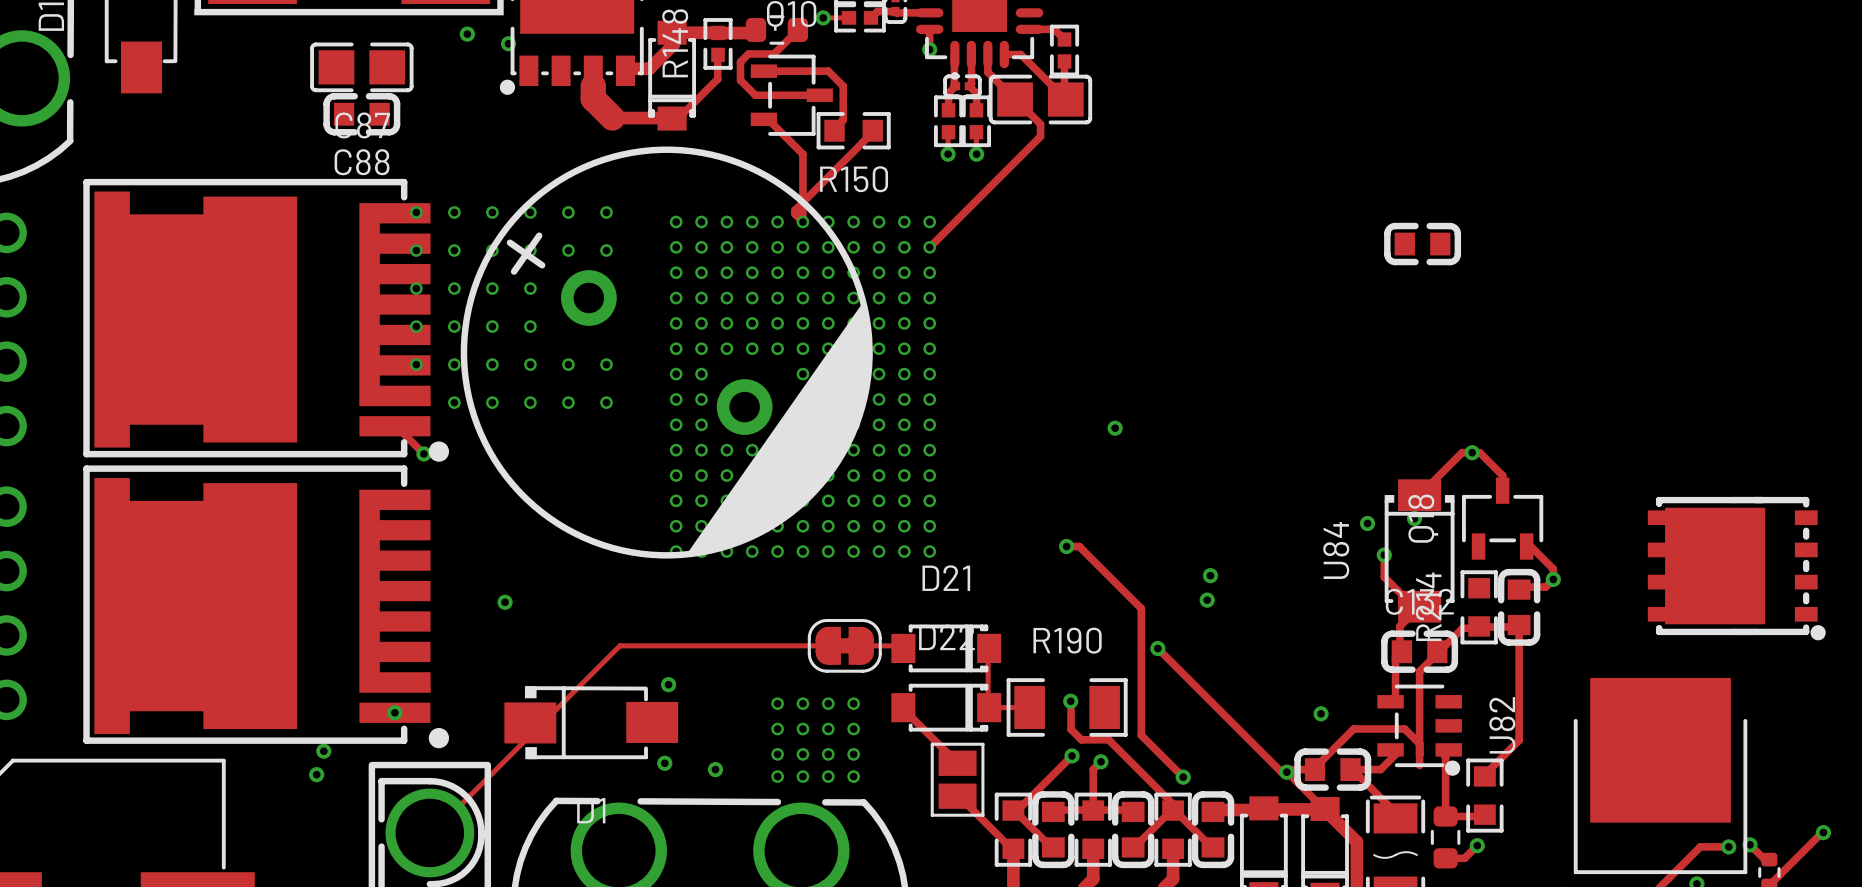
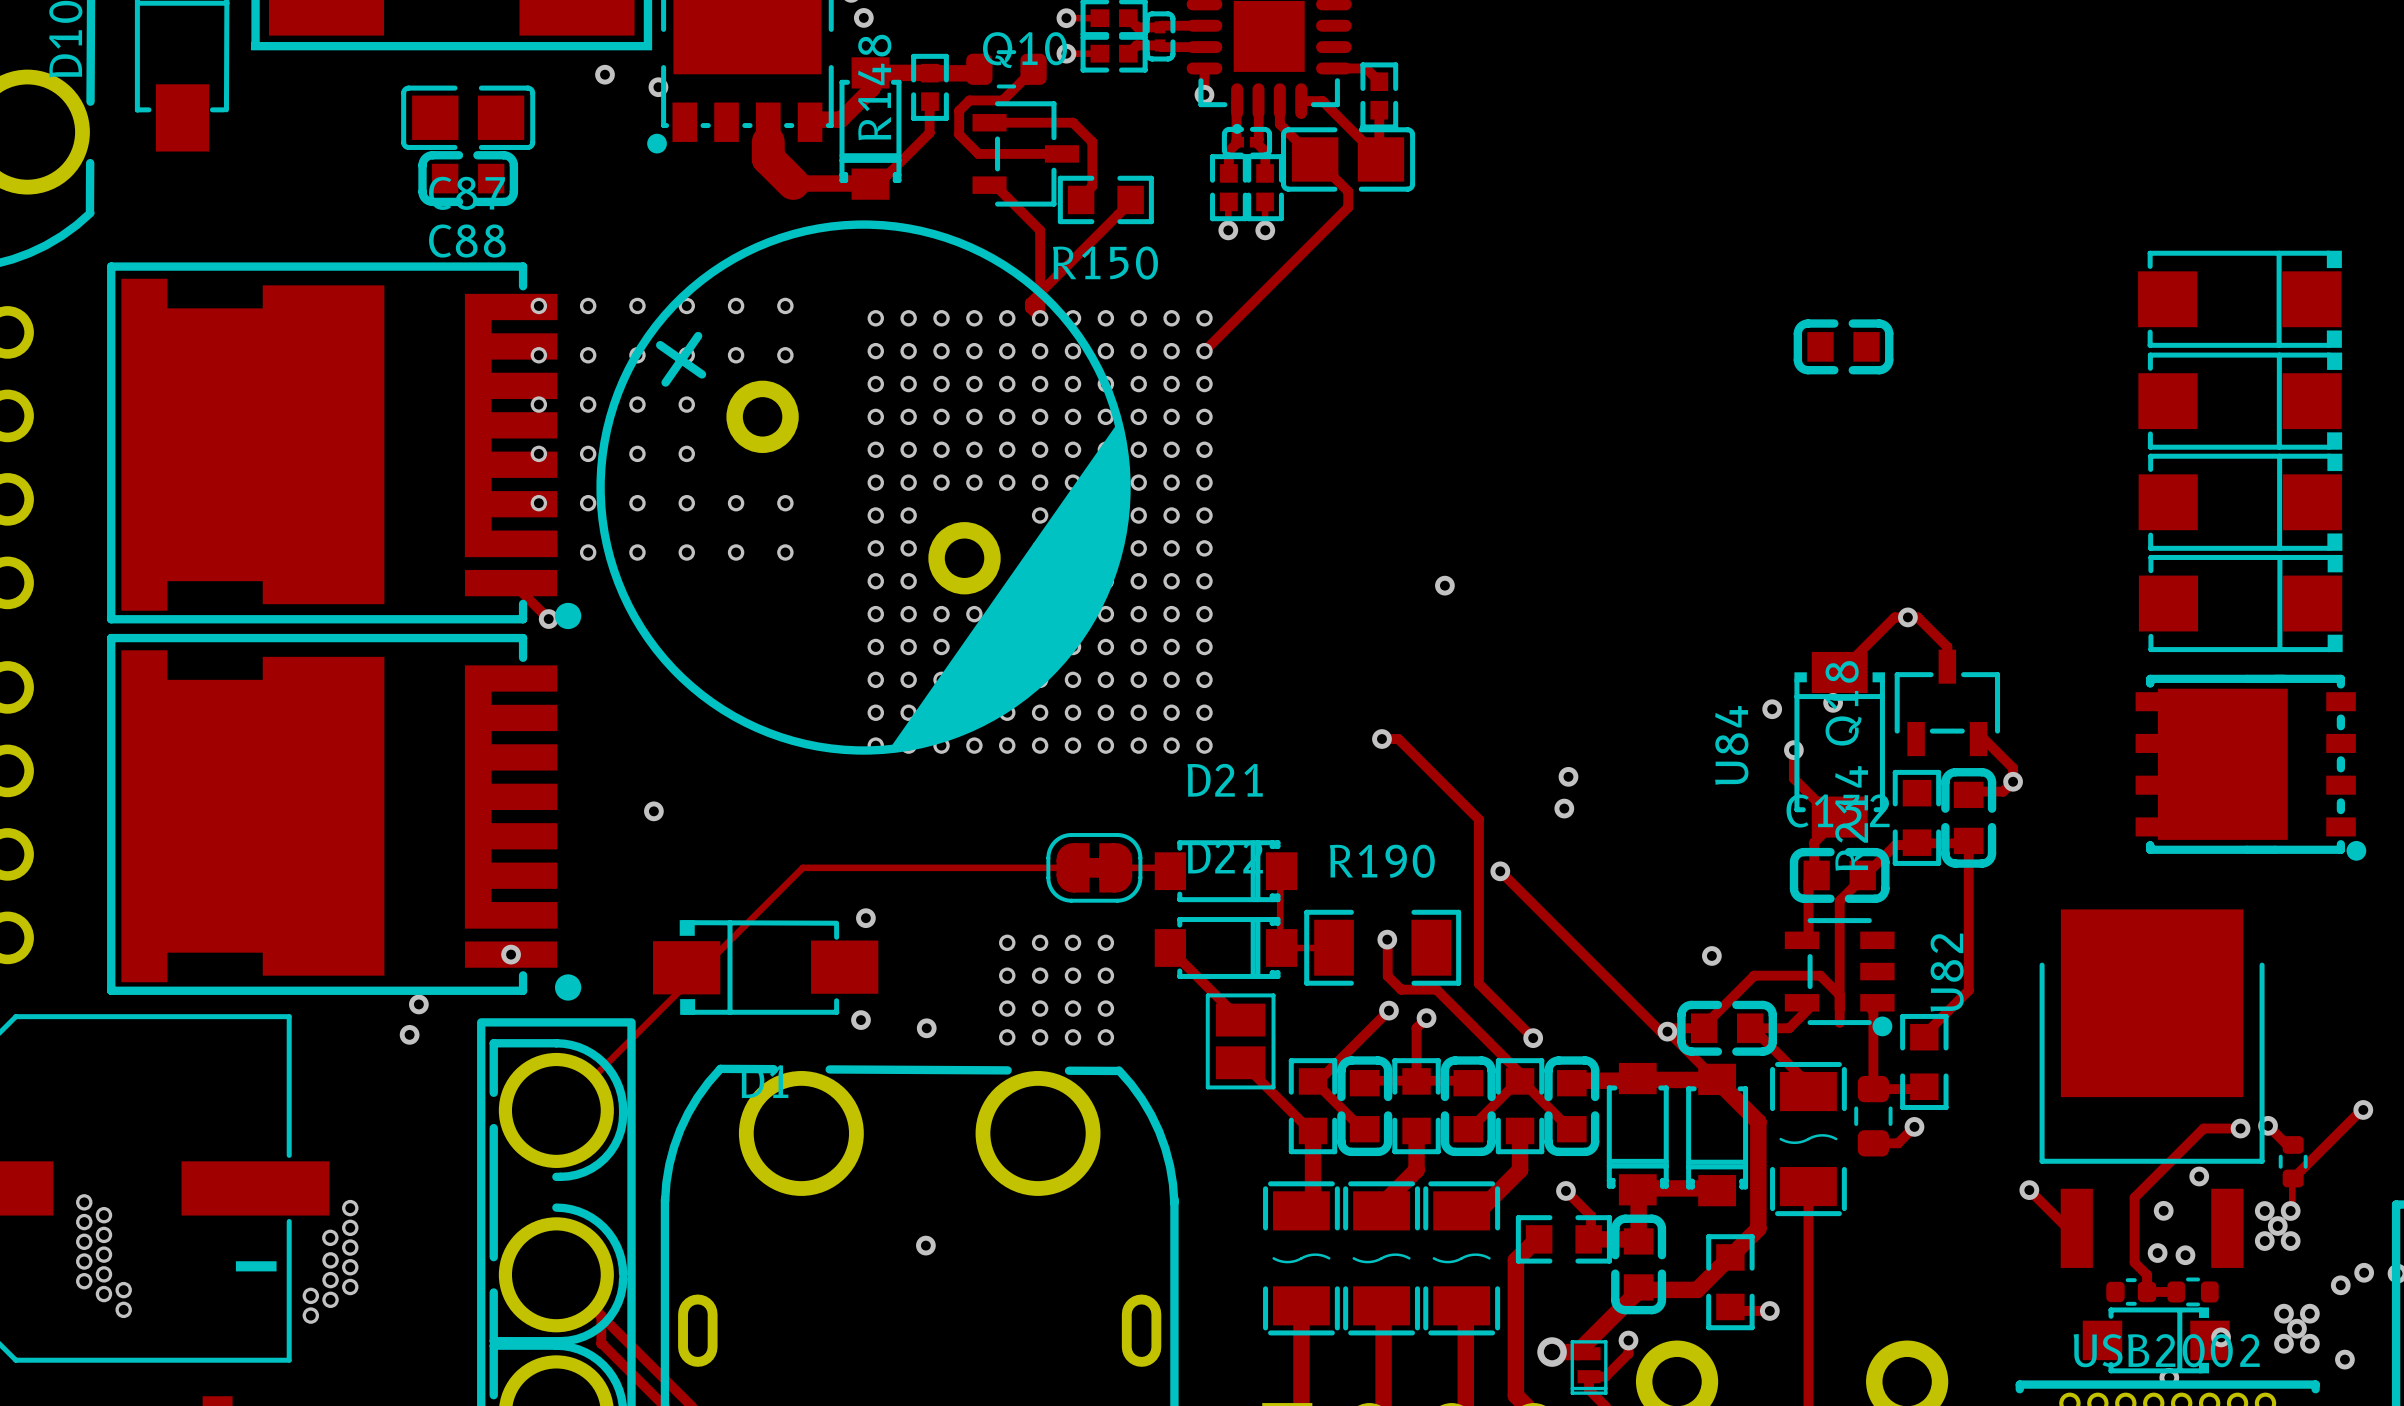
part: none -> (2239, 299)
part: none -> (2240, 401)
part: none -> (2240, 502)
part: none -> (2240, 603)

